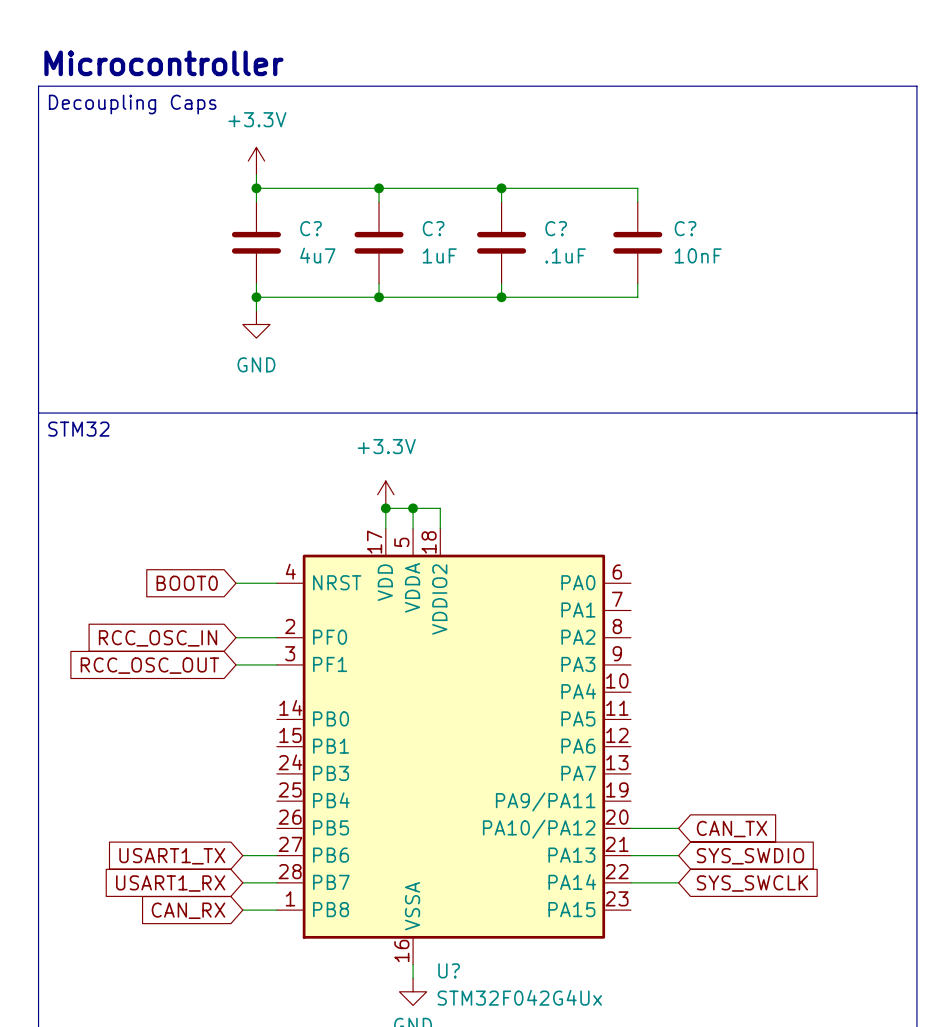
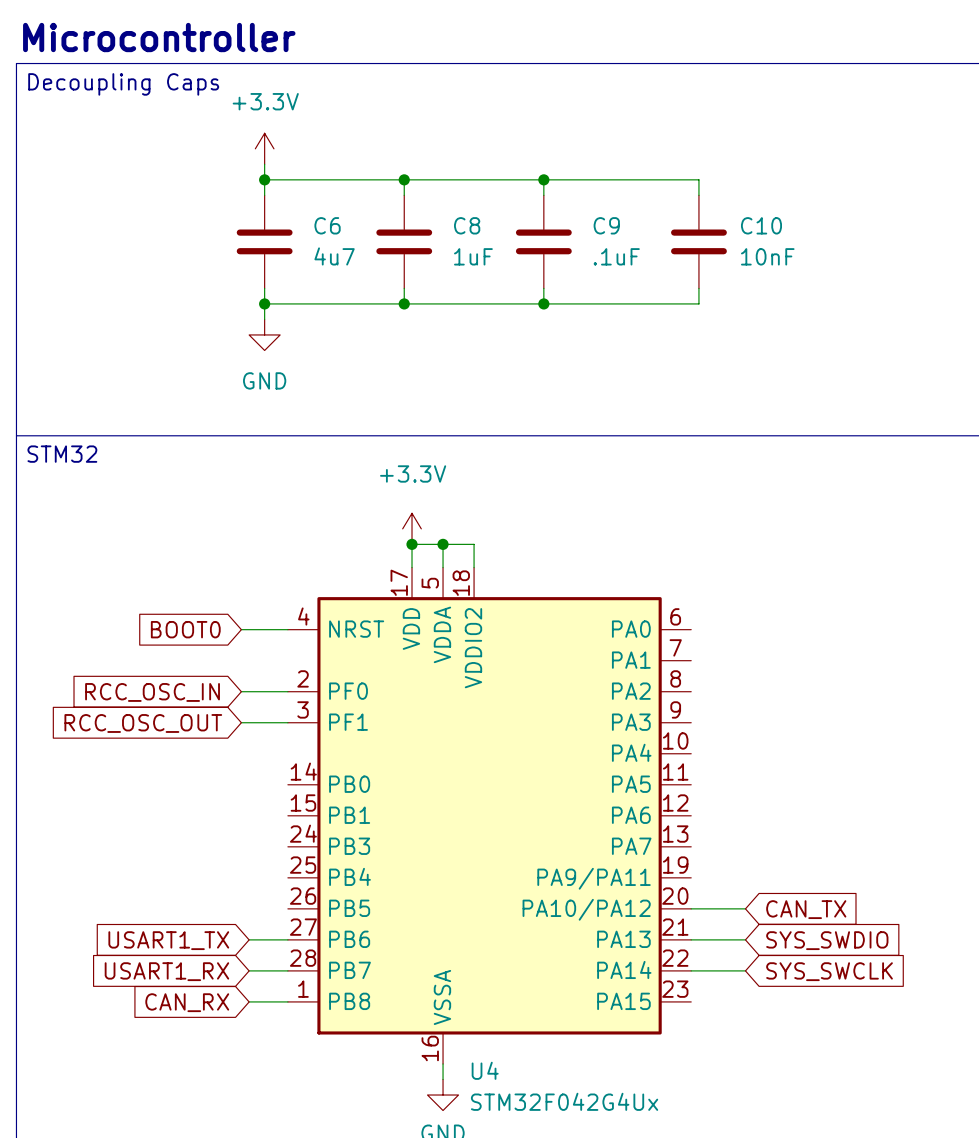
C? name: C? (311, 228) -> C6 (327, 225)
C? name: C? (433, 228) -> C8 (467, 225)
C? name: C? (556, 228) -> C9 (606, 225)
C? name: C? (685, 228) -> C10 (761, 225)
U? name: U? (449, 970) -> U4 (485, 1070)

